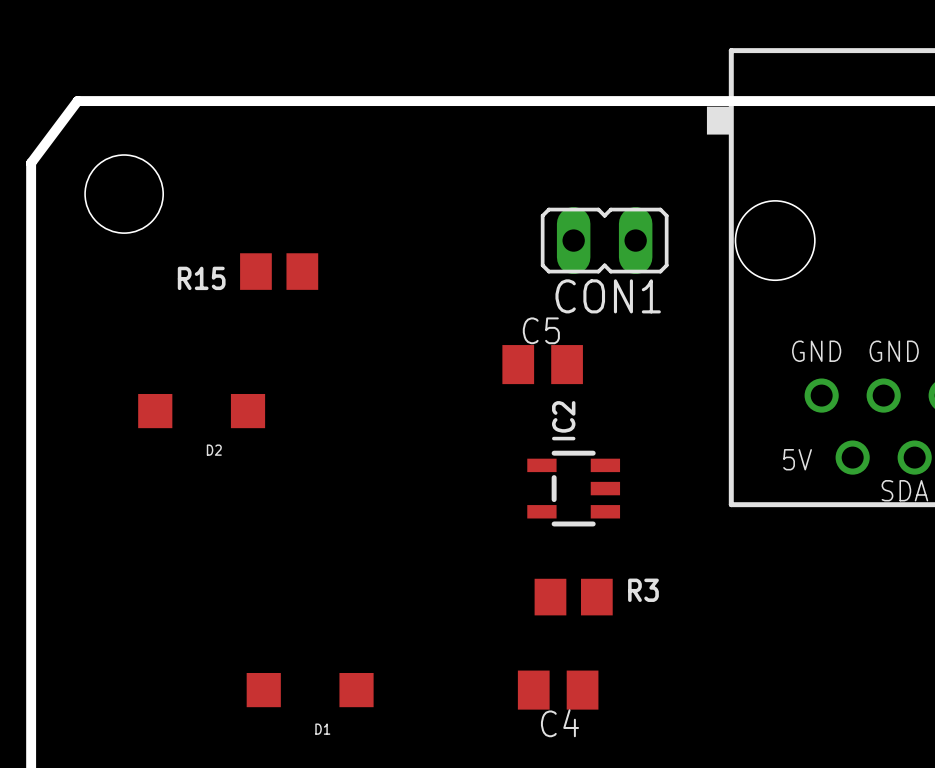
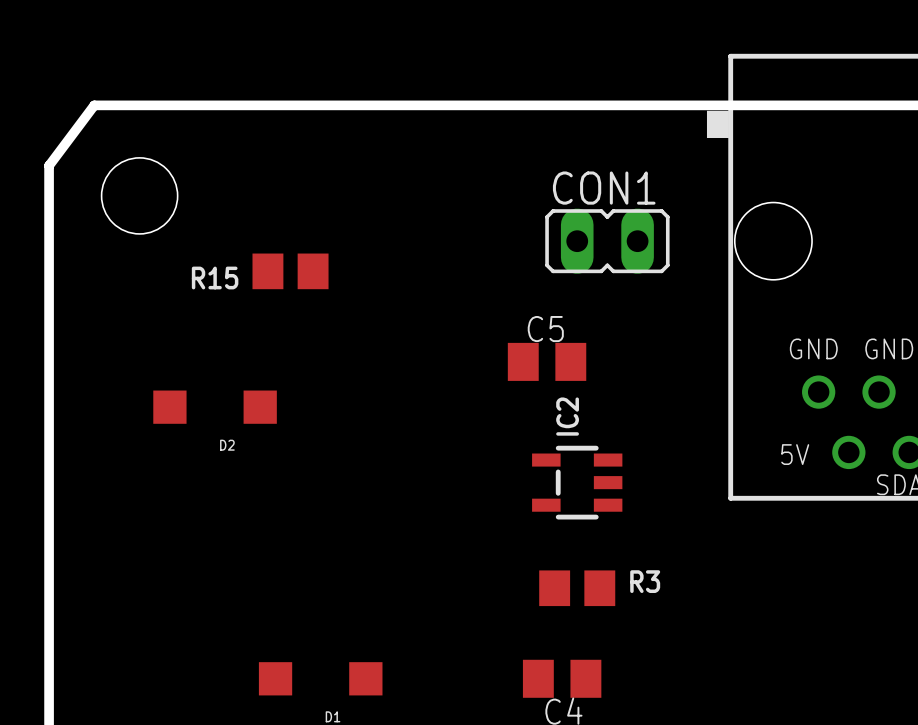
CON1 name position: CON1 (608, 296) -> CON1 (604, 188)

